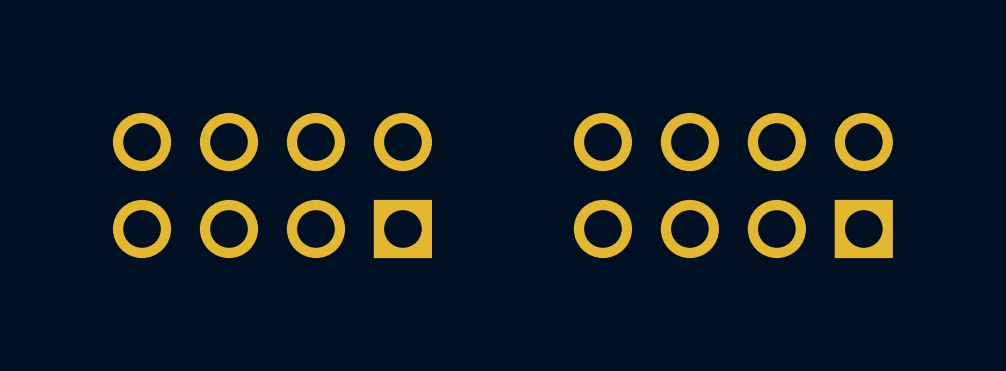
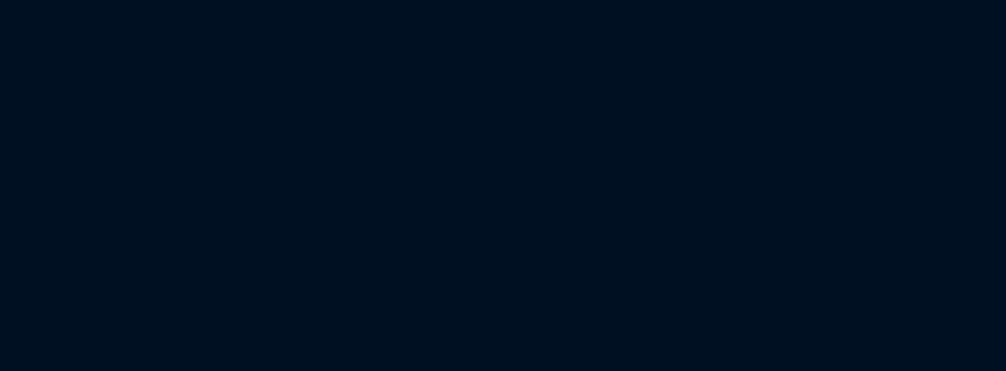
part: (272, 185) -> none
part: (733, 185) -> none

